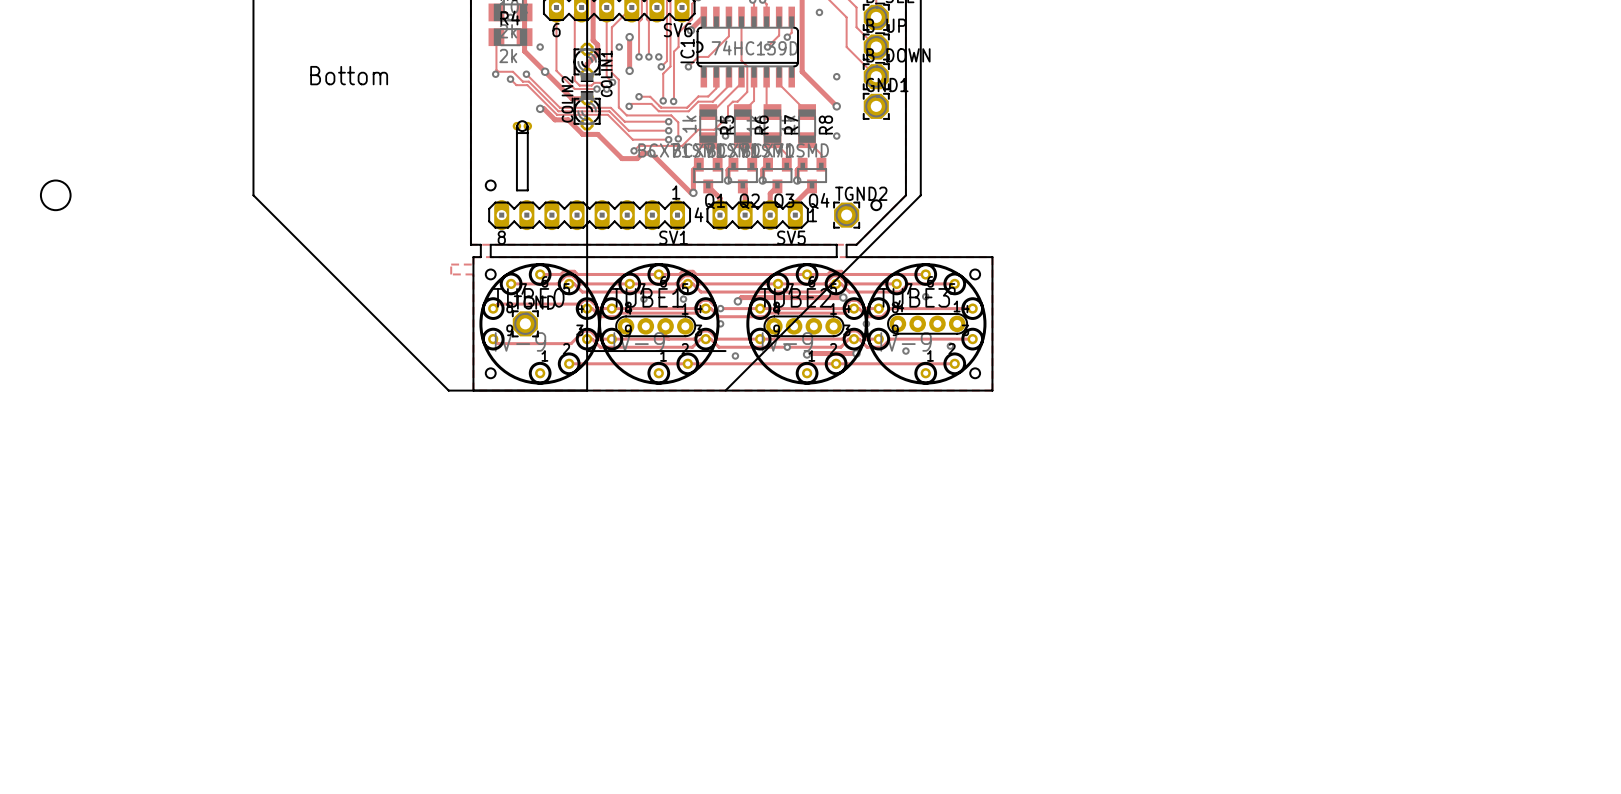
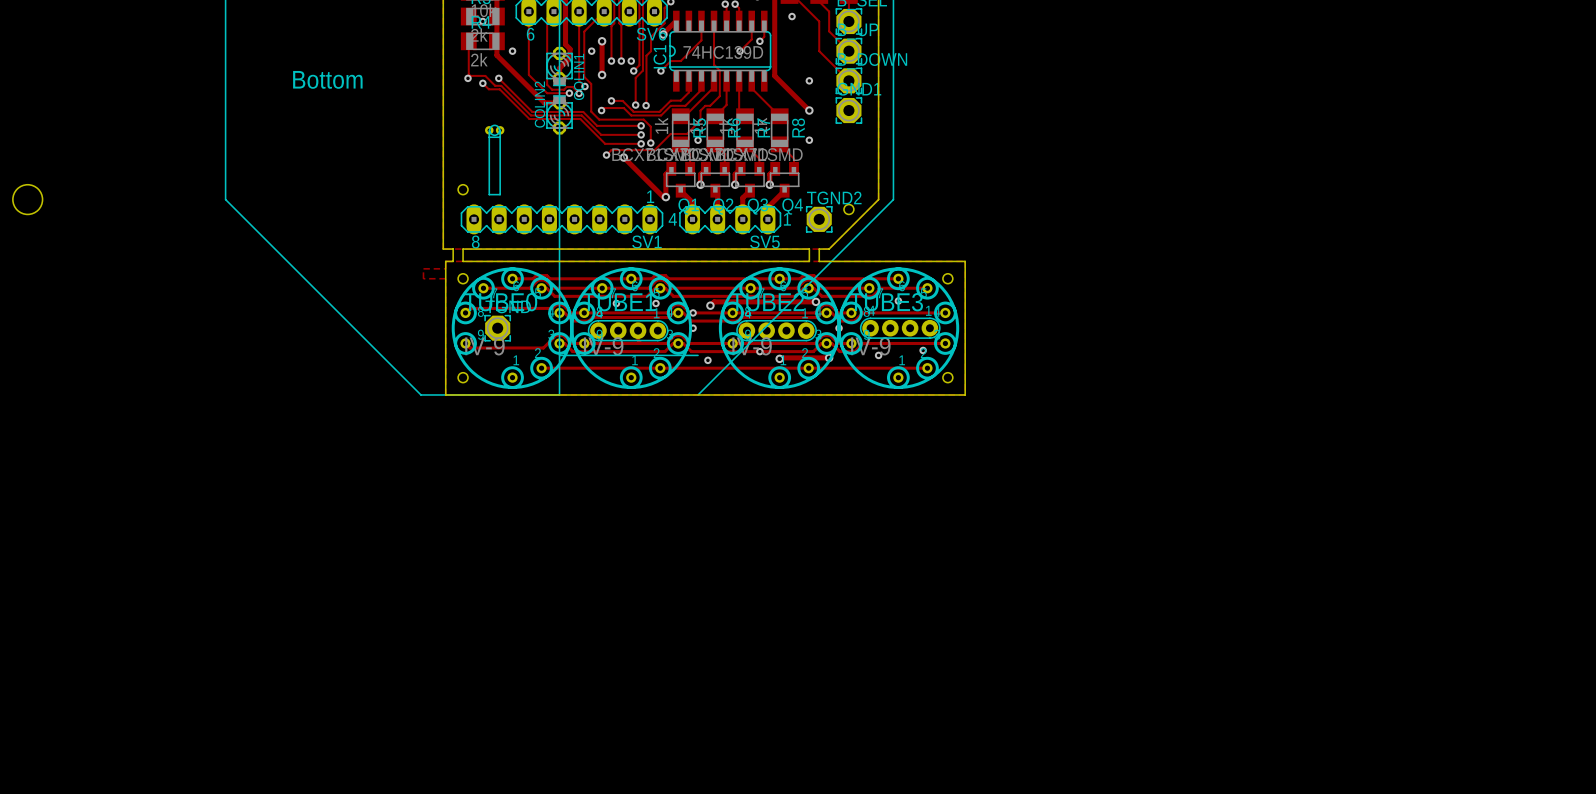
via: (545, 71) -> none
track: (540, 108) (543, 108) (555, 119) (568, 119) (582, 134) (597, 134) (622, 158) (637, 158) (642, 153) (651, 153) -> none
via: (540, 108) -> none

